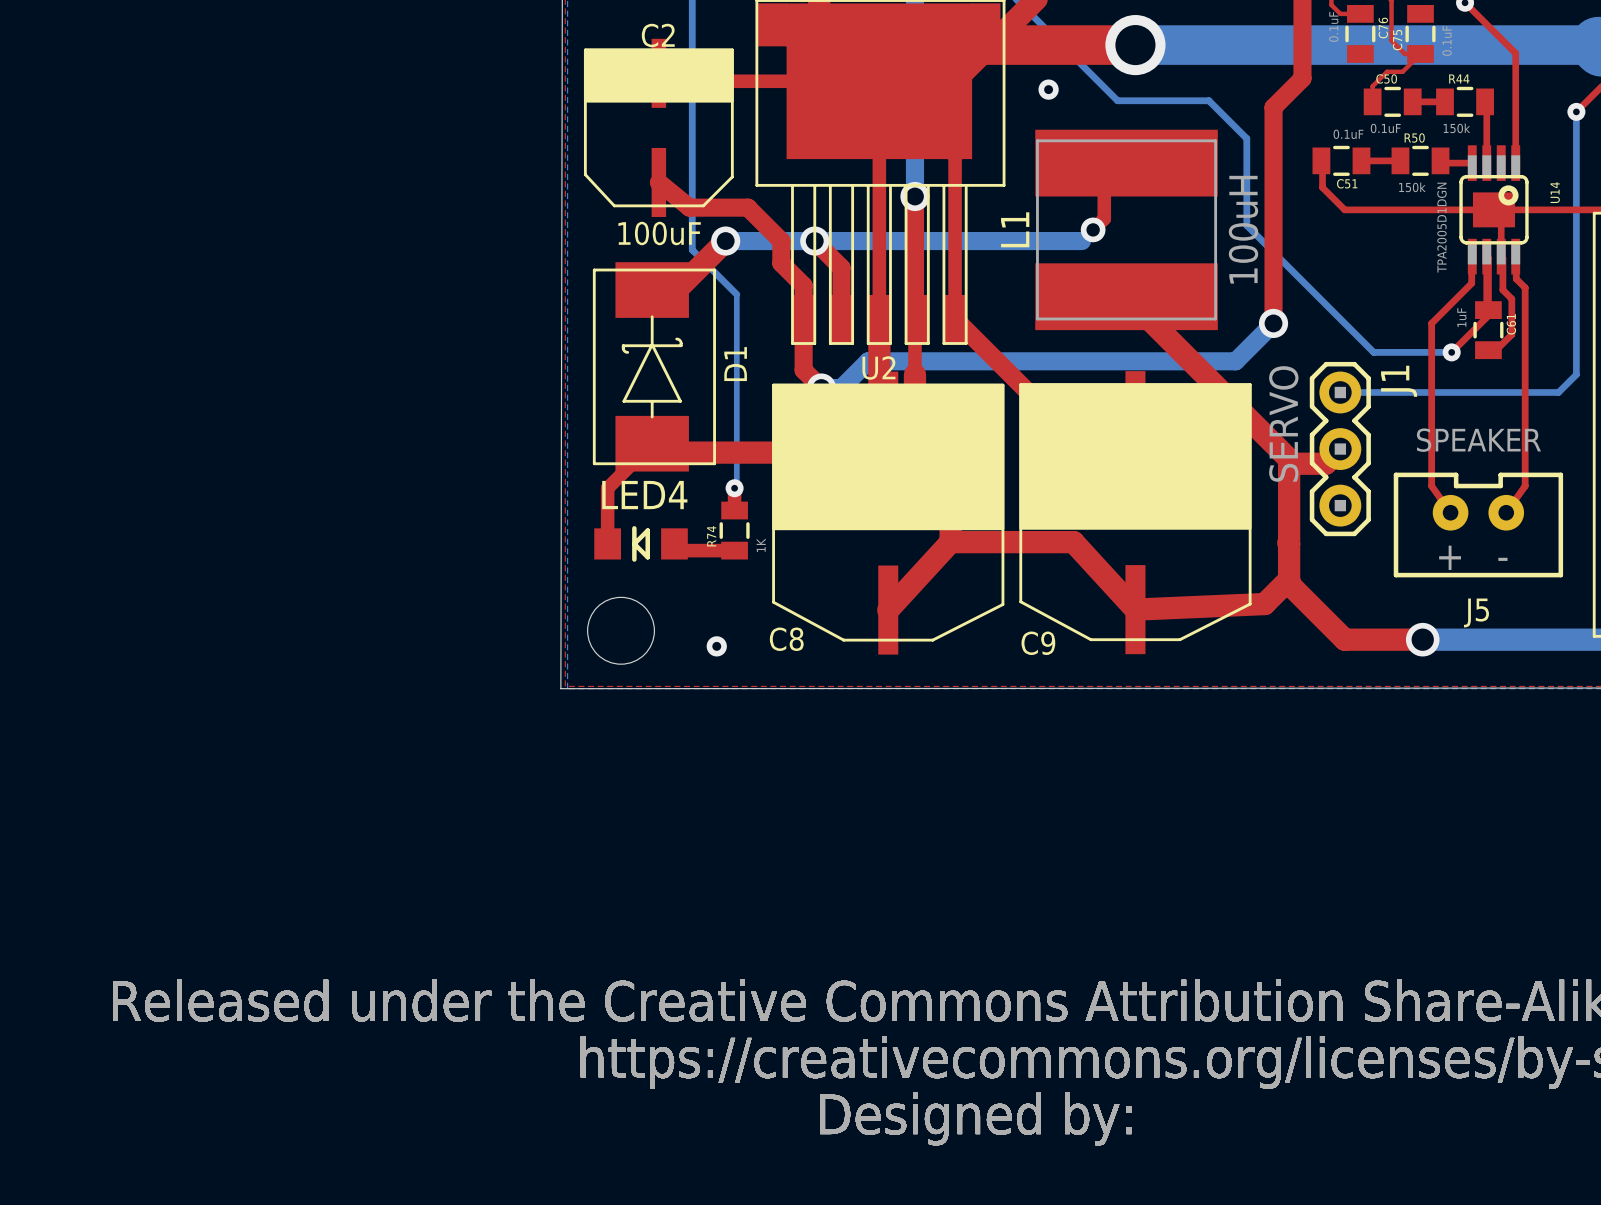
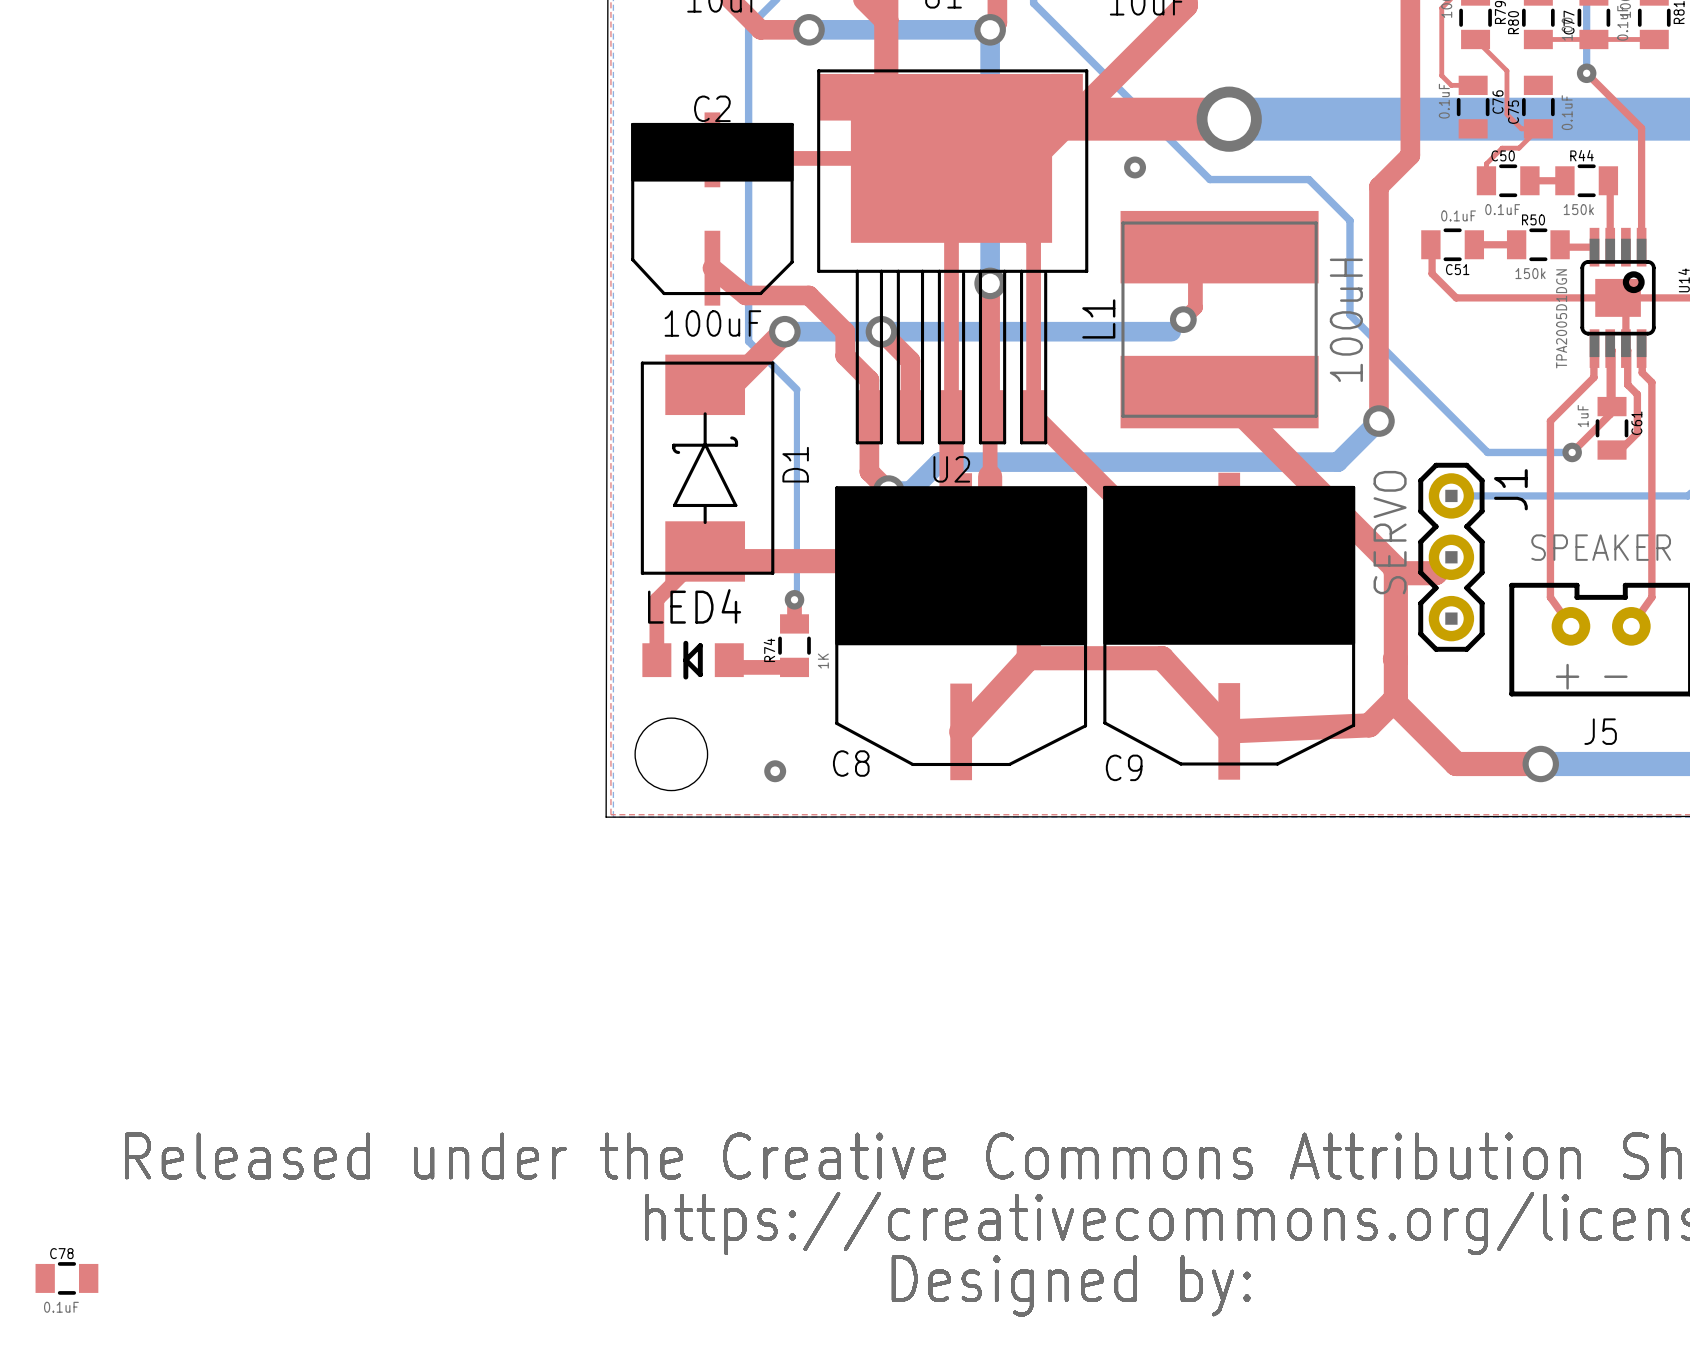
C78: none -> 0.1uF (66, 1278)

